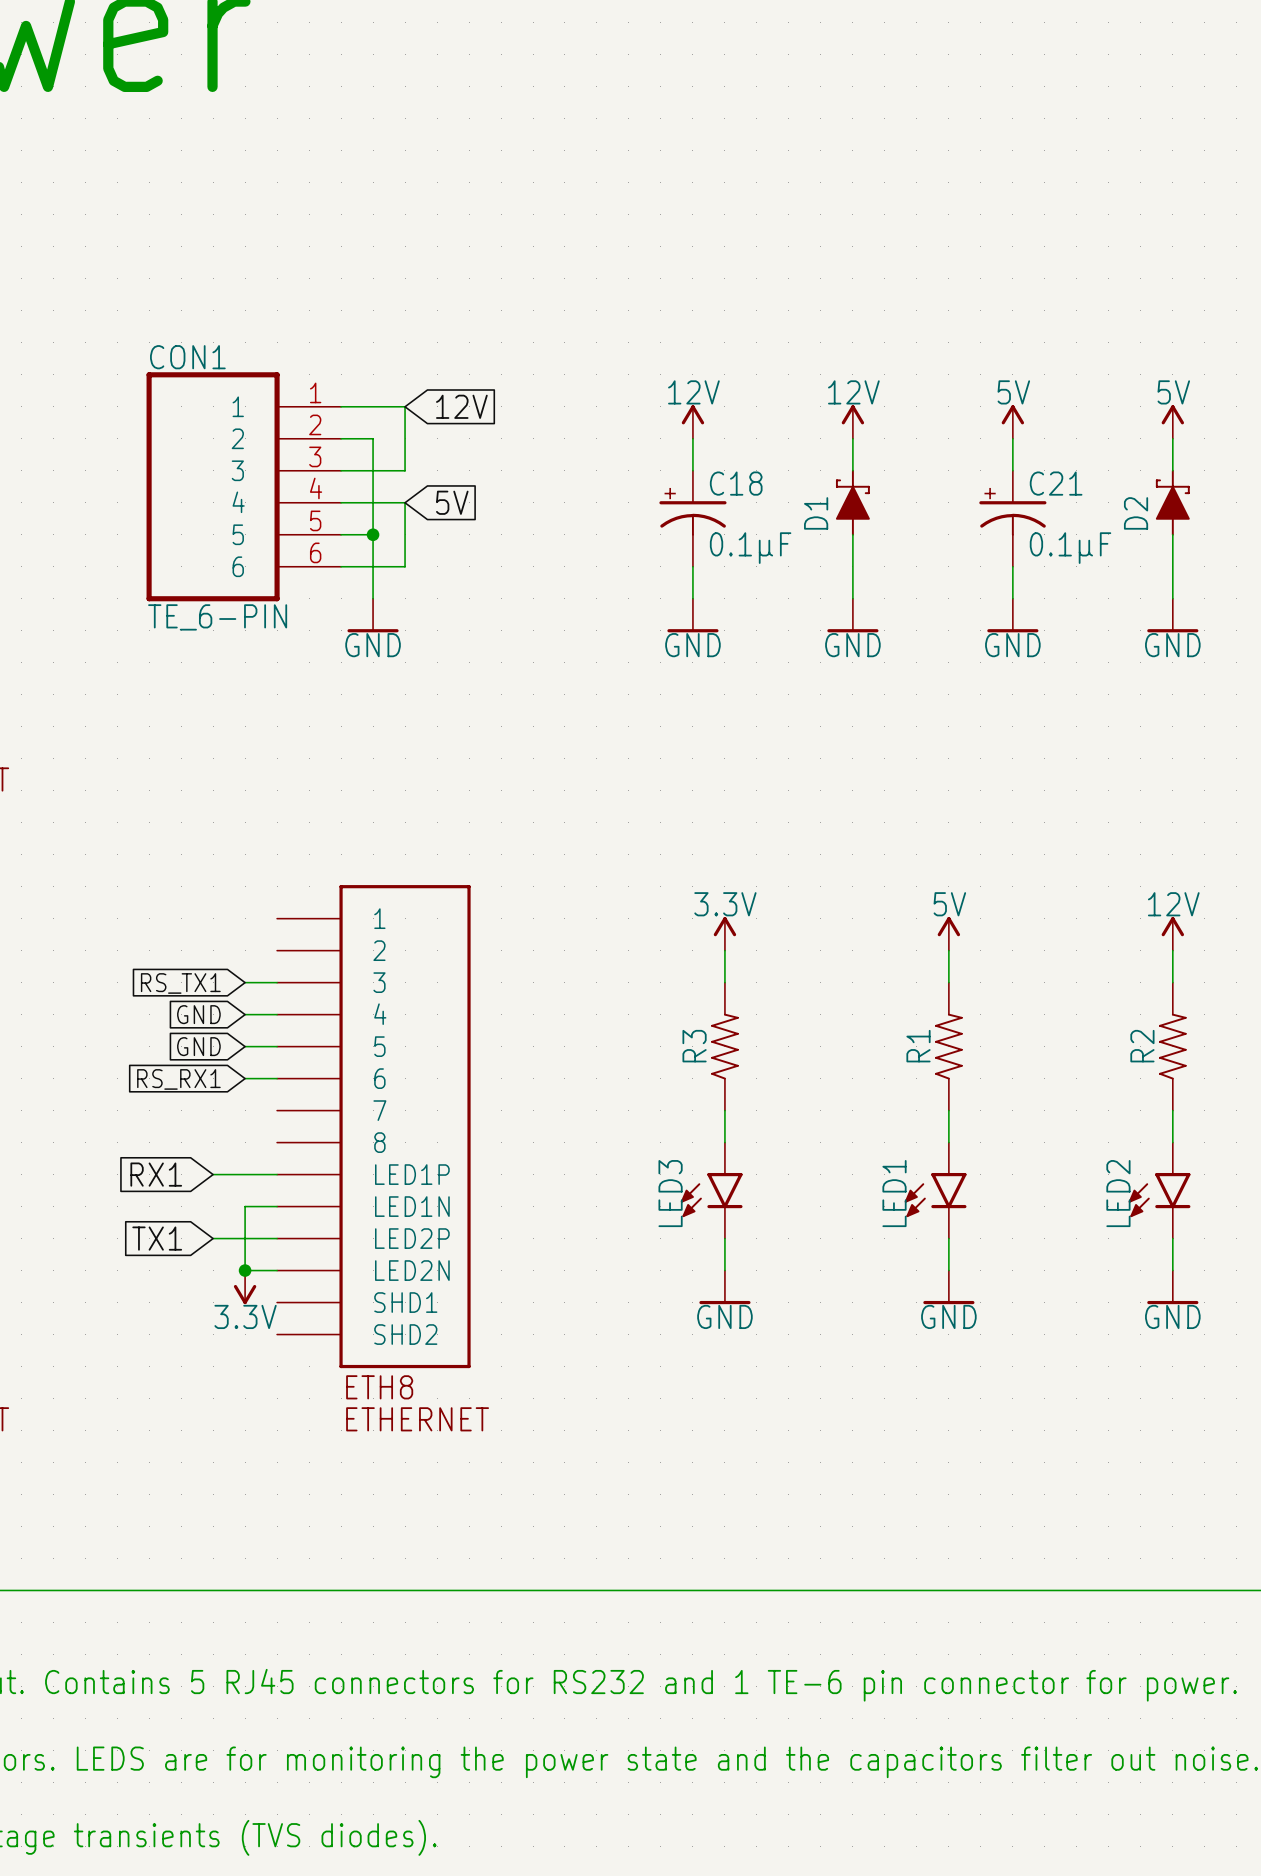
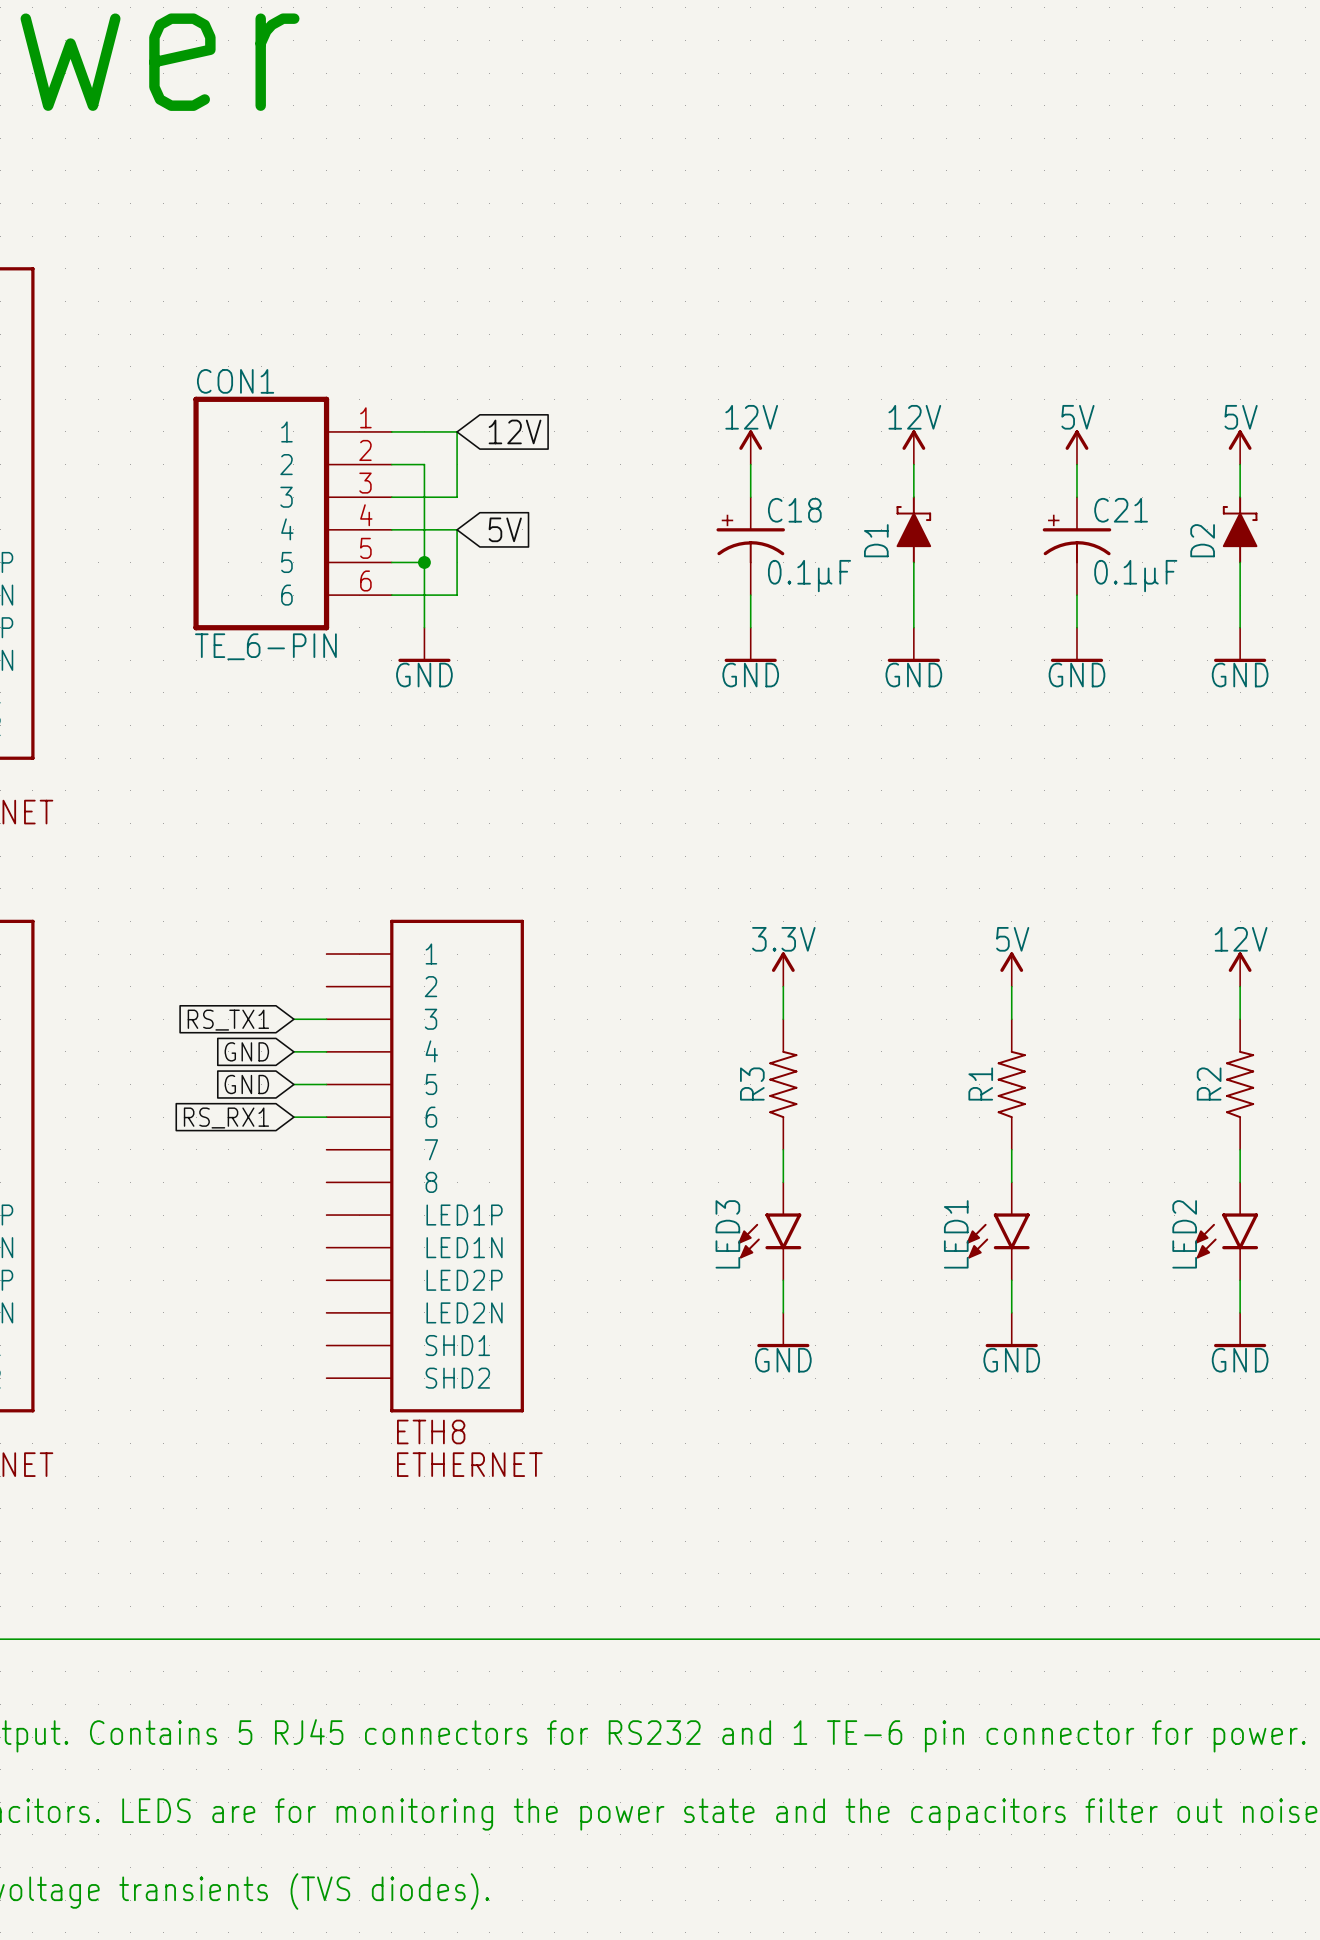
global label: RX1 (156, 1174) -> none
wire: (213, 1174) (277, 1174) -> none
wire: (277, 1206) (245, 1206) (245, 1270) (277, 1270) -> none
global label: TX1 (157, 1238) -> none
wire: (213, 1238) (277, 1238) -> none
junction: (245, 1270) -> none
power symbol: 3.3V (245, 1287) -> none

